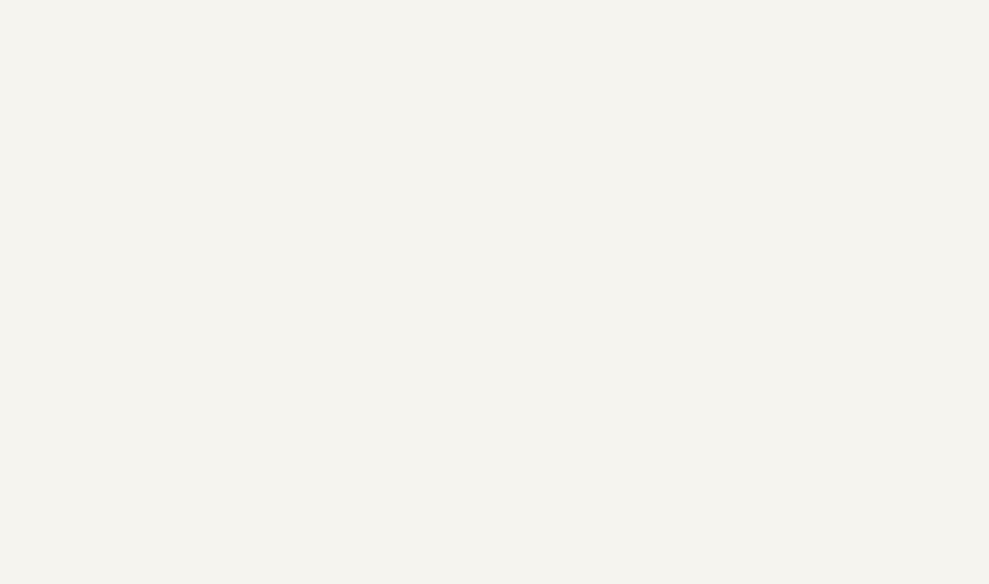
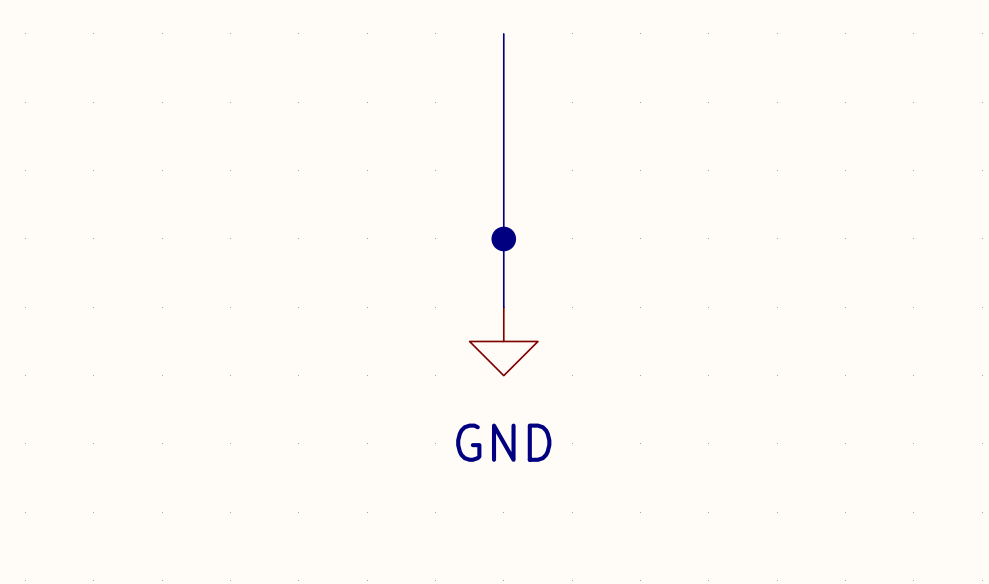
wire: none -> (503, 33) (503, 307)
junction: none -> (503, 238)
power symbol: none -> GND (503, 341)

